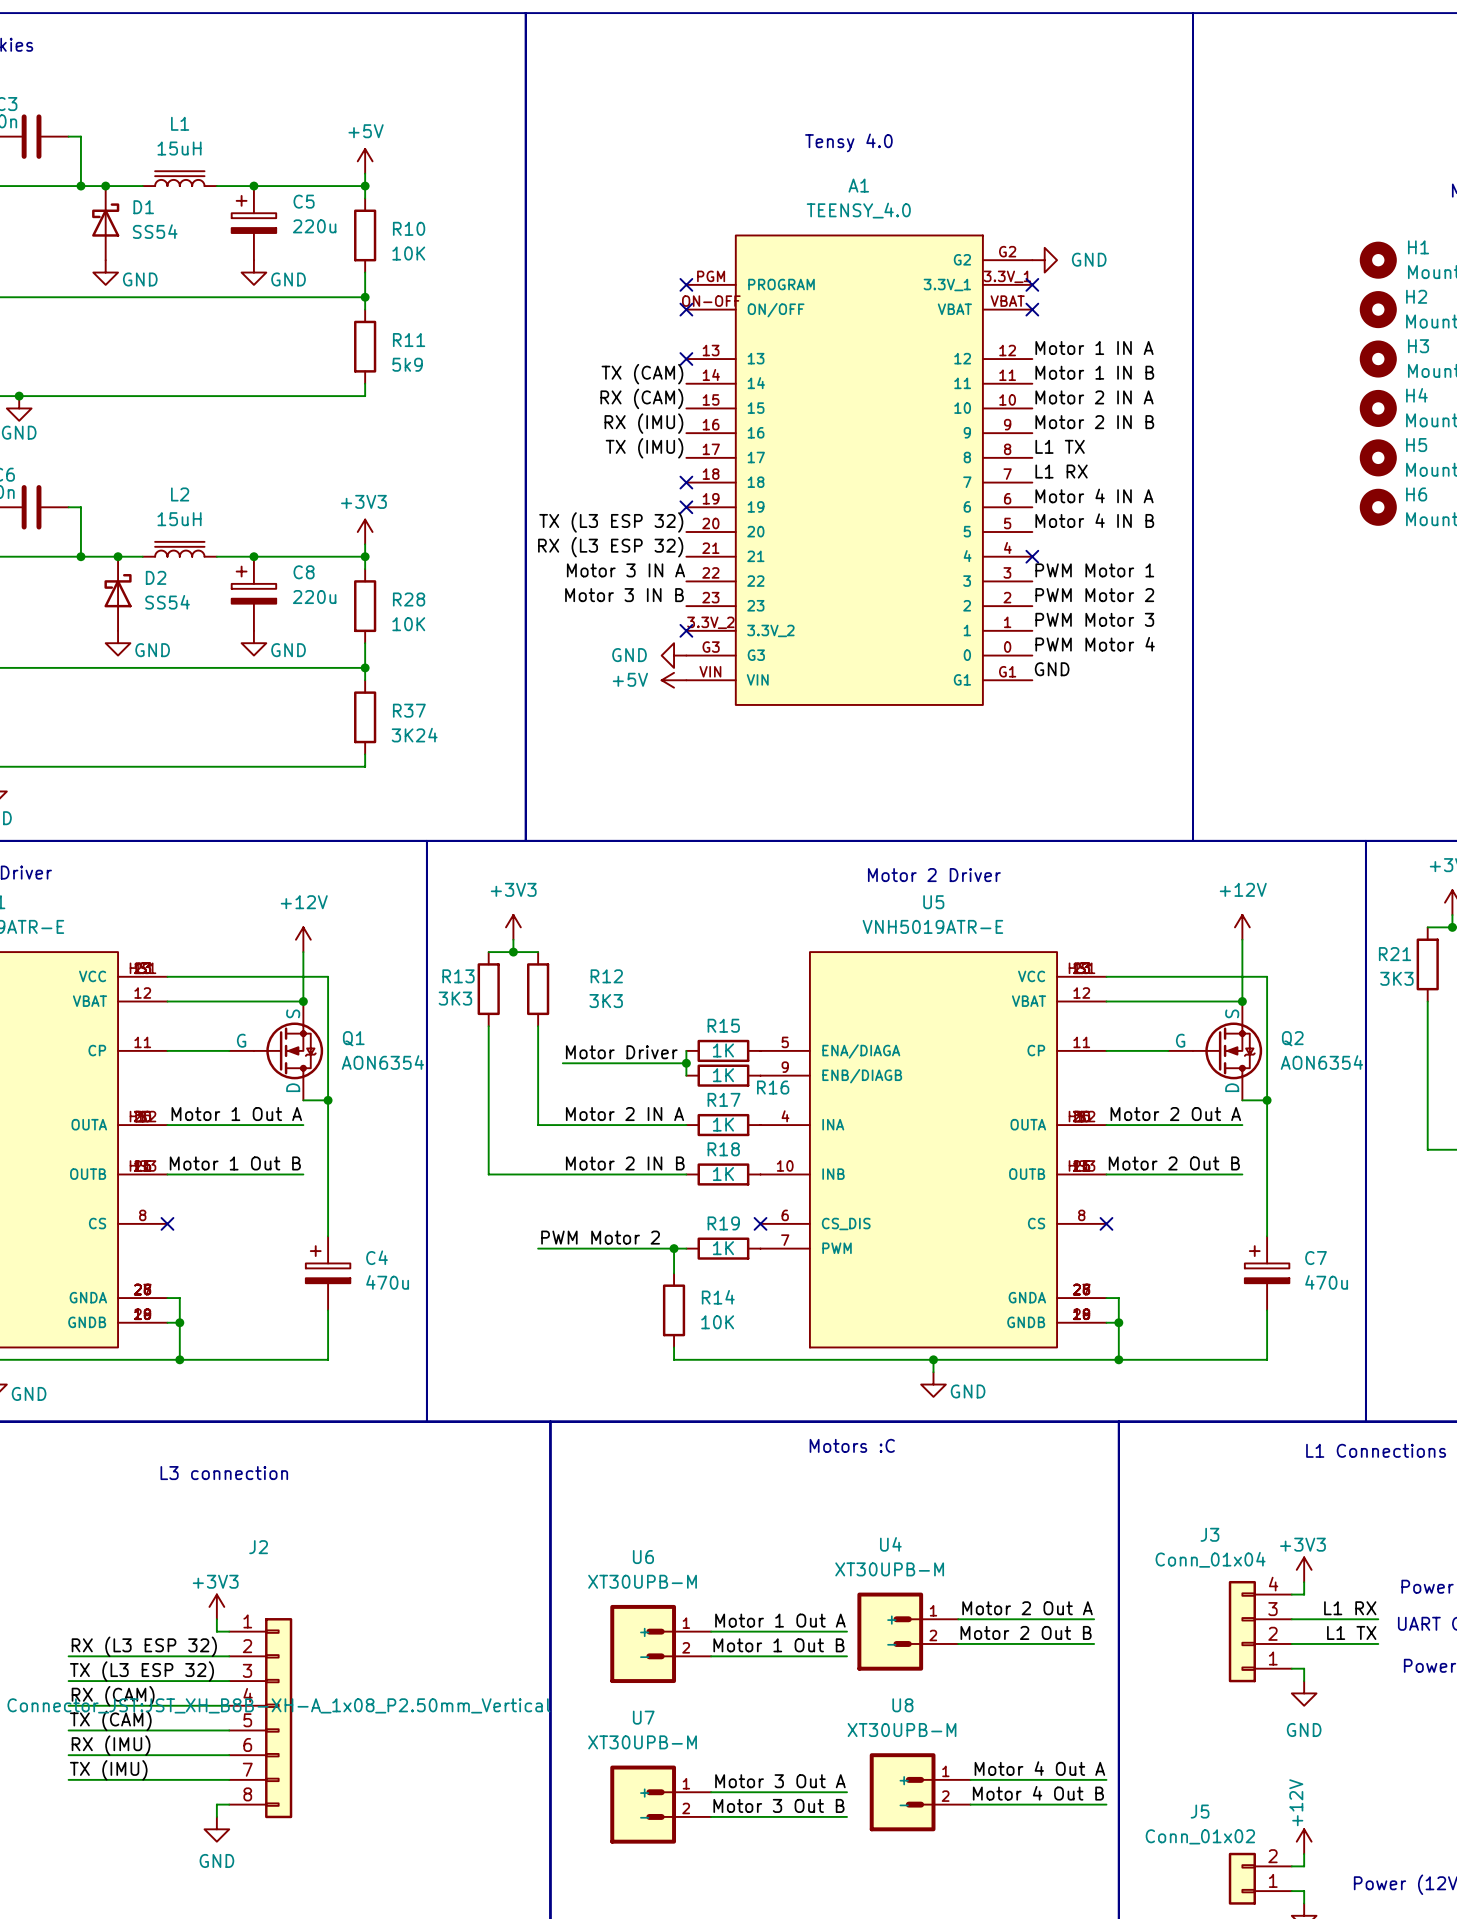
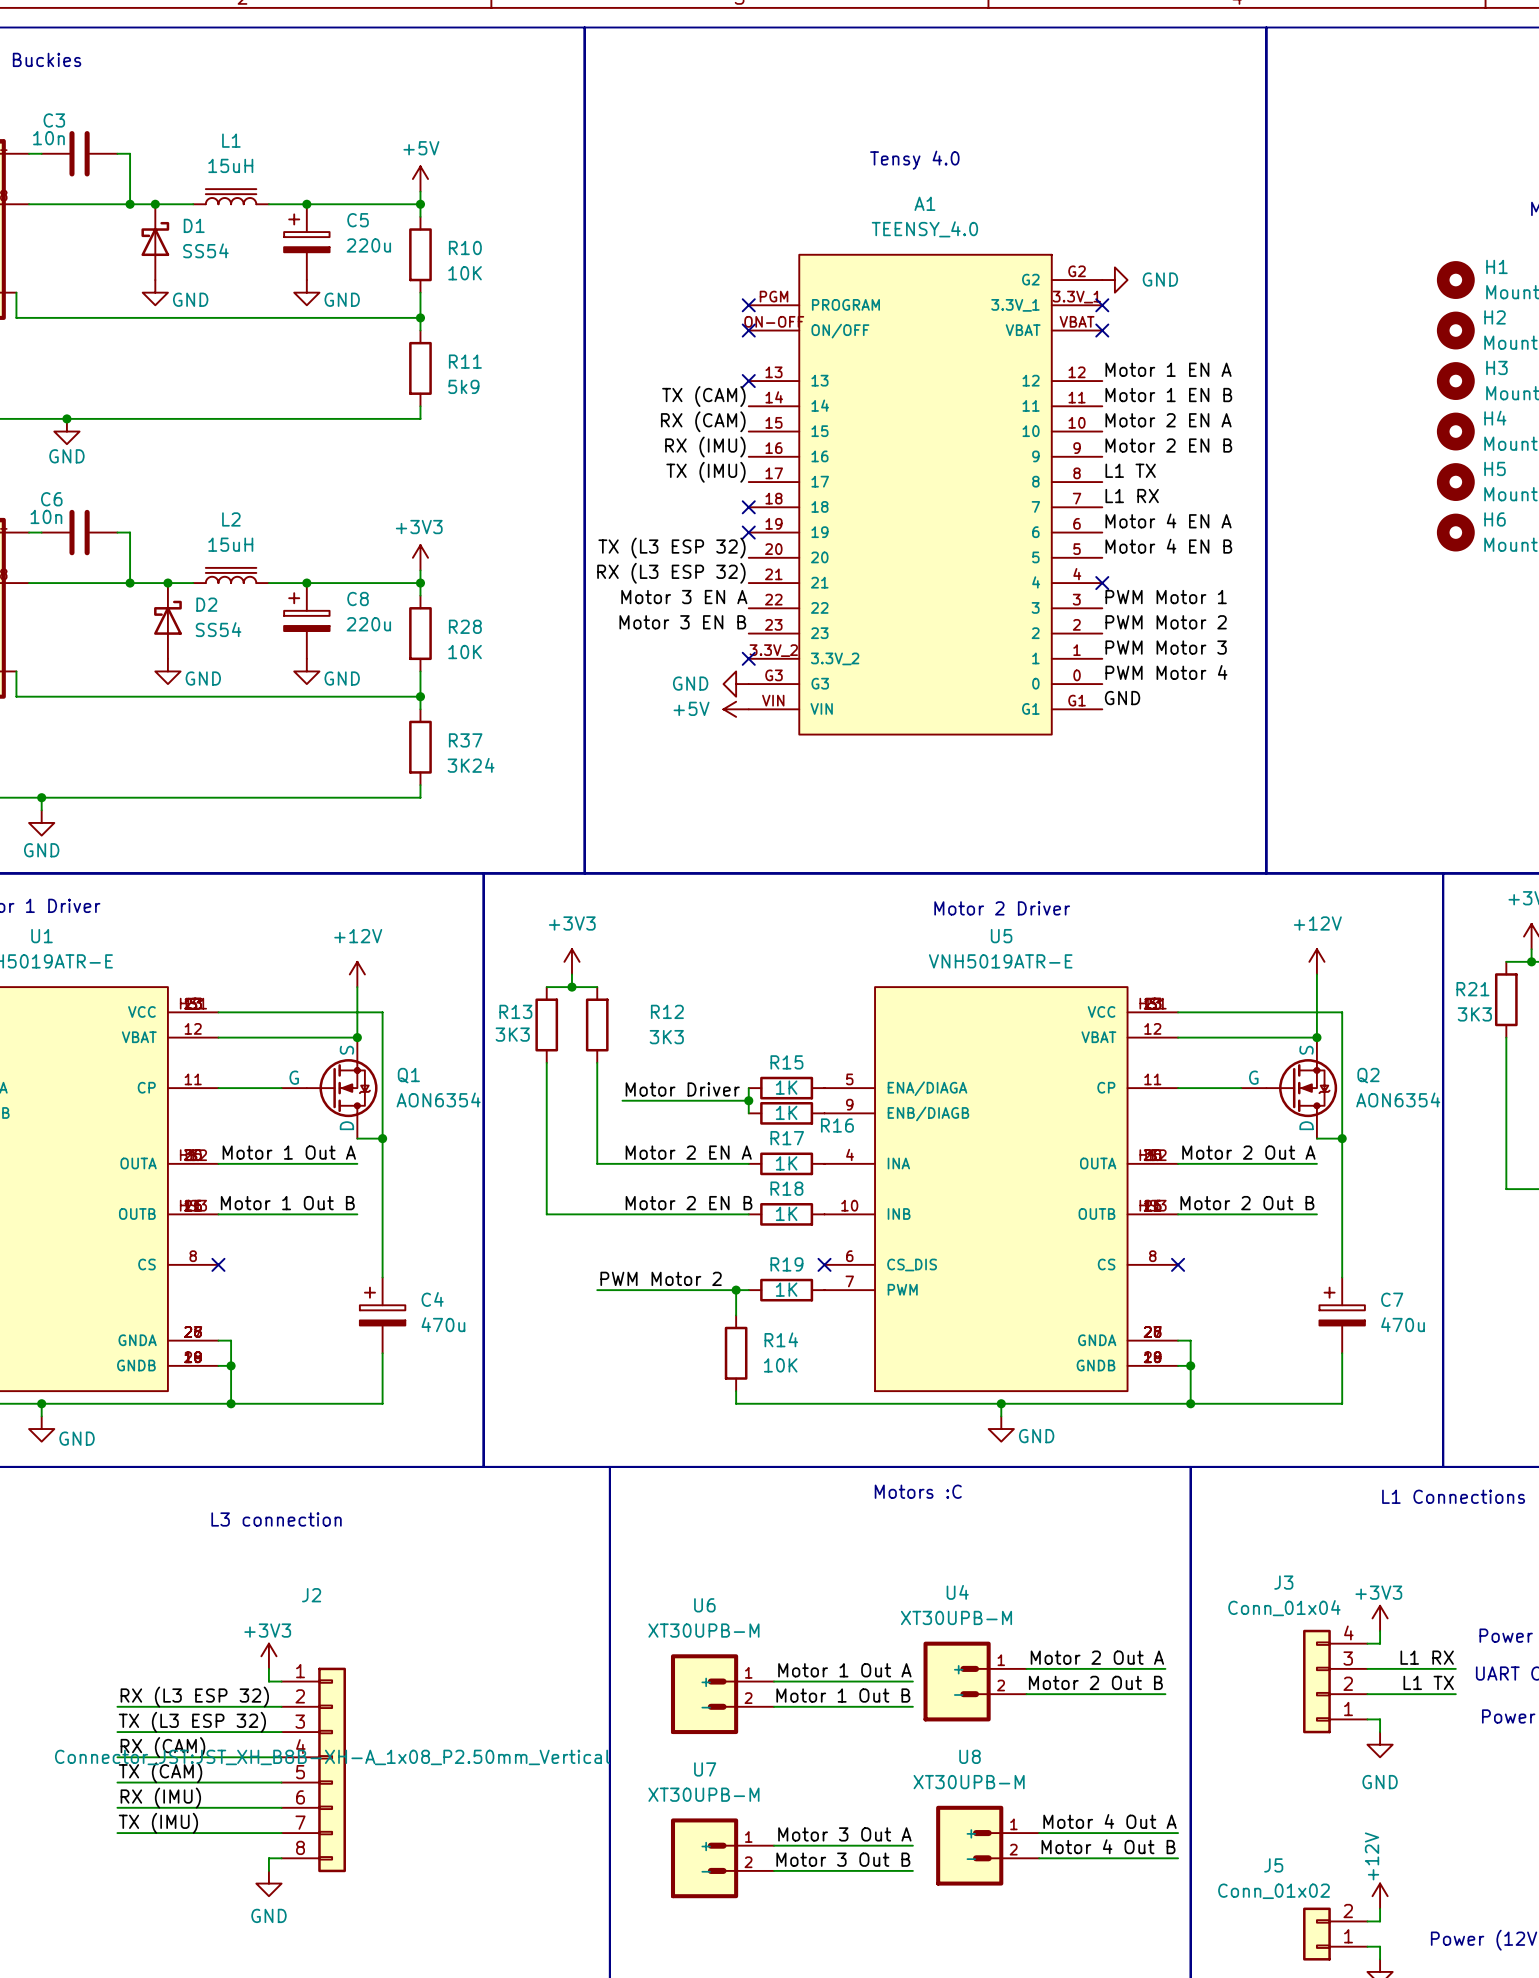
label: Motor 1 IN A (1094, 348) -> Motor 1 EN A (1168, 369)
label: Motor 1 IN B (1094, 372) -> Motor 1 EN B (1168, 395)
label: Motor 2 IN A (1094, 397) -> Motor 2 EN A (1168, 420)
label: Motor 2 IN B (1094, 422) -> Motor 2 EN B (1168, 445)
label: Motor 4 IN A (1094, 495) -> Motor 4 EN A (1168, 520)
label: Motor 4 IN B (1094, 520) -> Motor 4 EN B (1168, 546)
label: Motor 3 IN A (625, 570) -> Motor 3 EN A (684, 597)
label: Motor 3 IN B (624, 595) -> Motor 3 EN B (682, 622)
label: Motor 2 IN A (625, 1114) -> Motor 2 EN A (688, 1152)
label: Motor 2 IN B (625, 1163) -> Motor 2 EN B (689, 1203)

